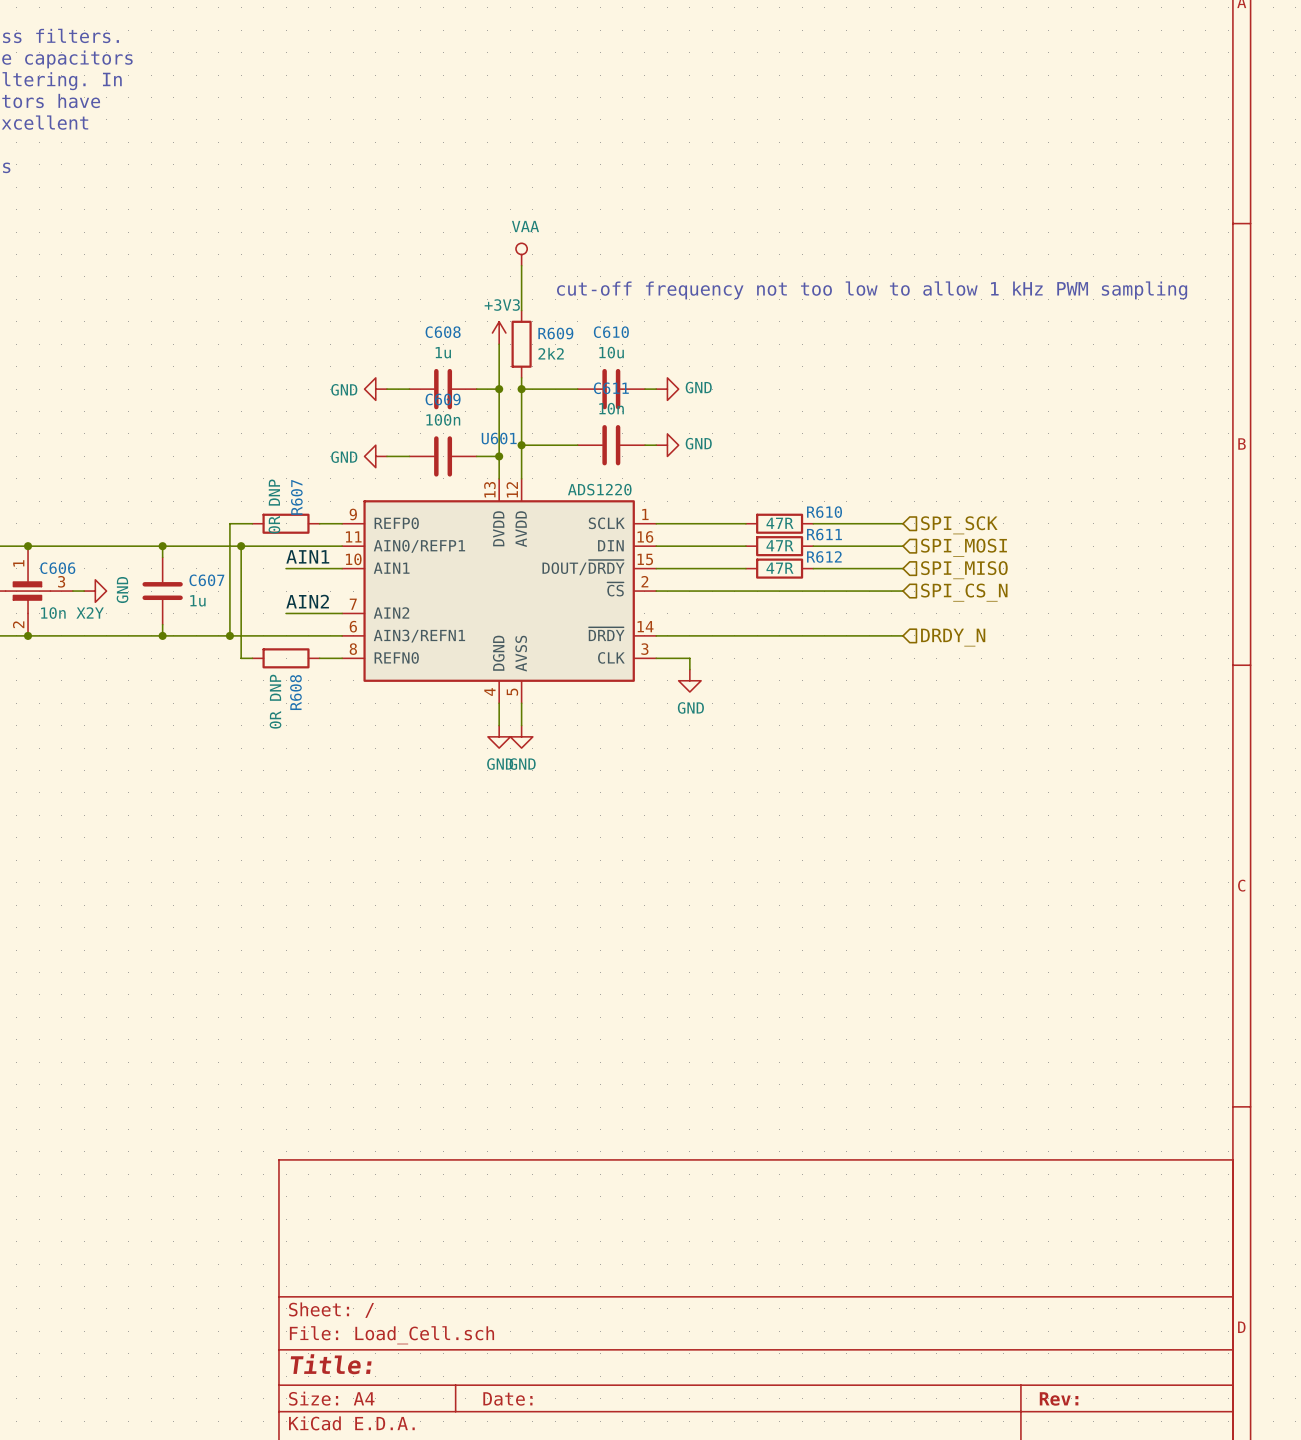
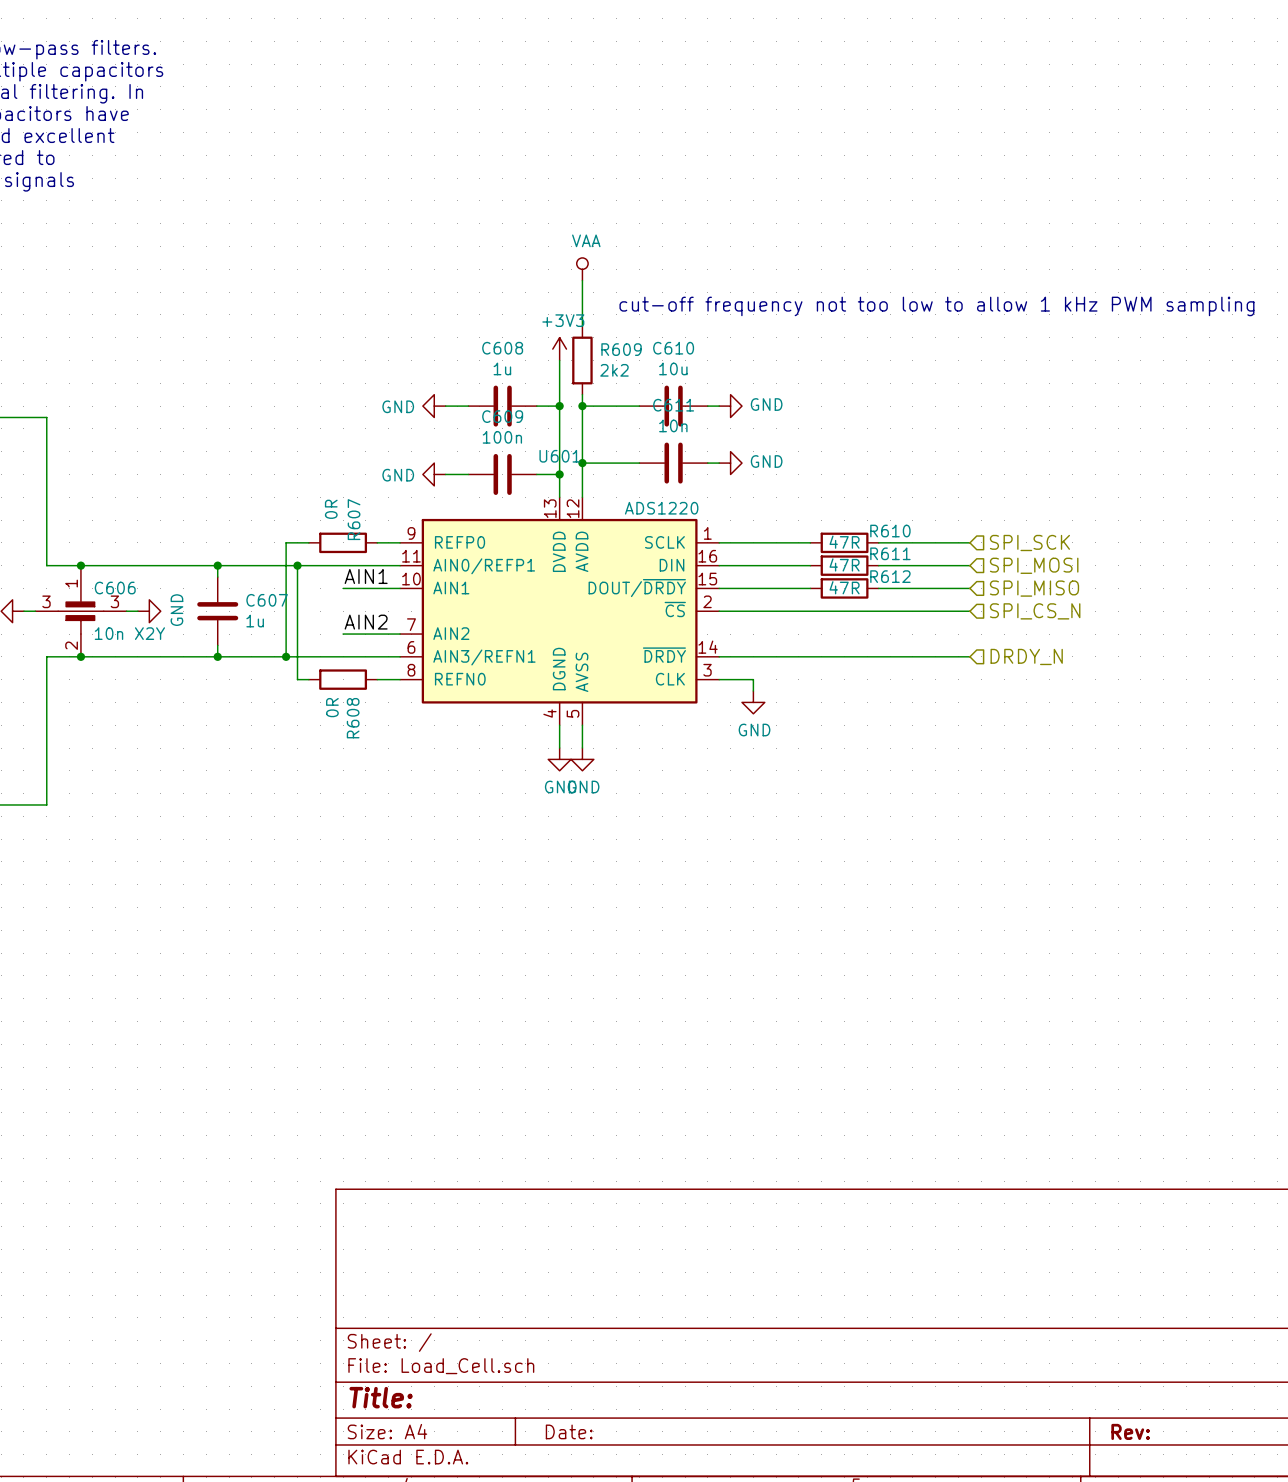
R607 value: 0R DNP (274, 506) -> 0R (331, 509)
R608 value: 0R DNP (275, 701) -> 0R (332, 707)

